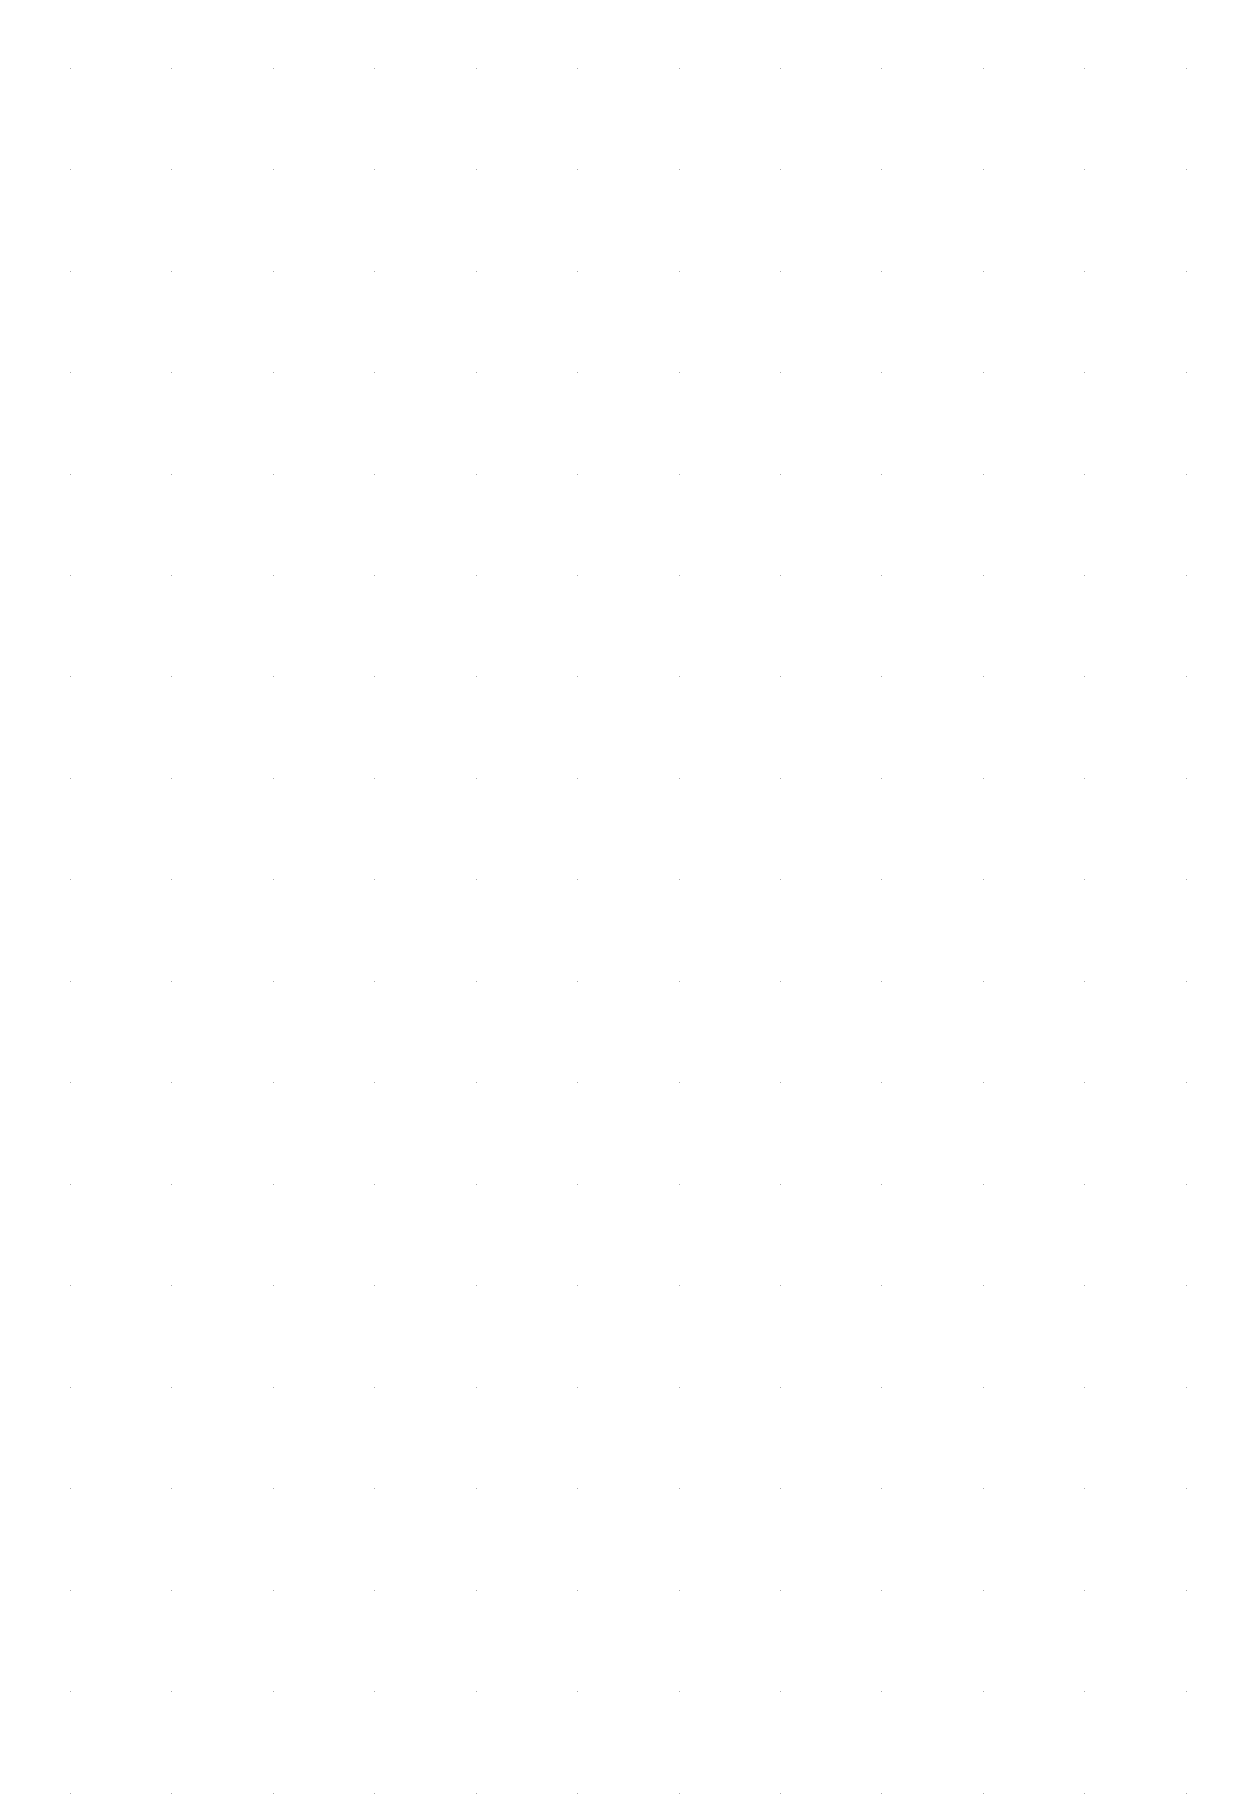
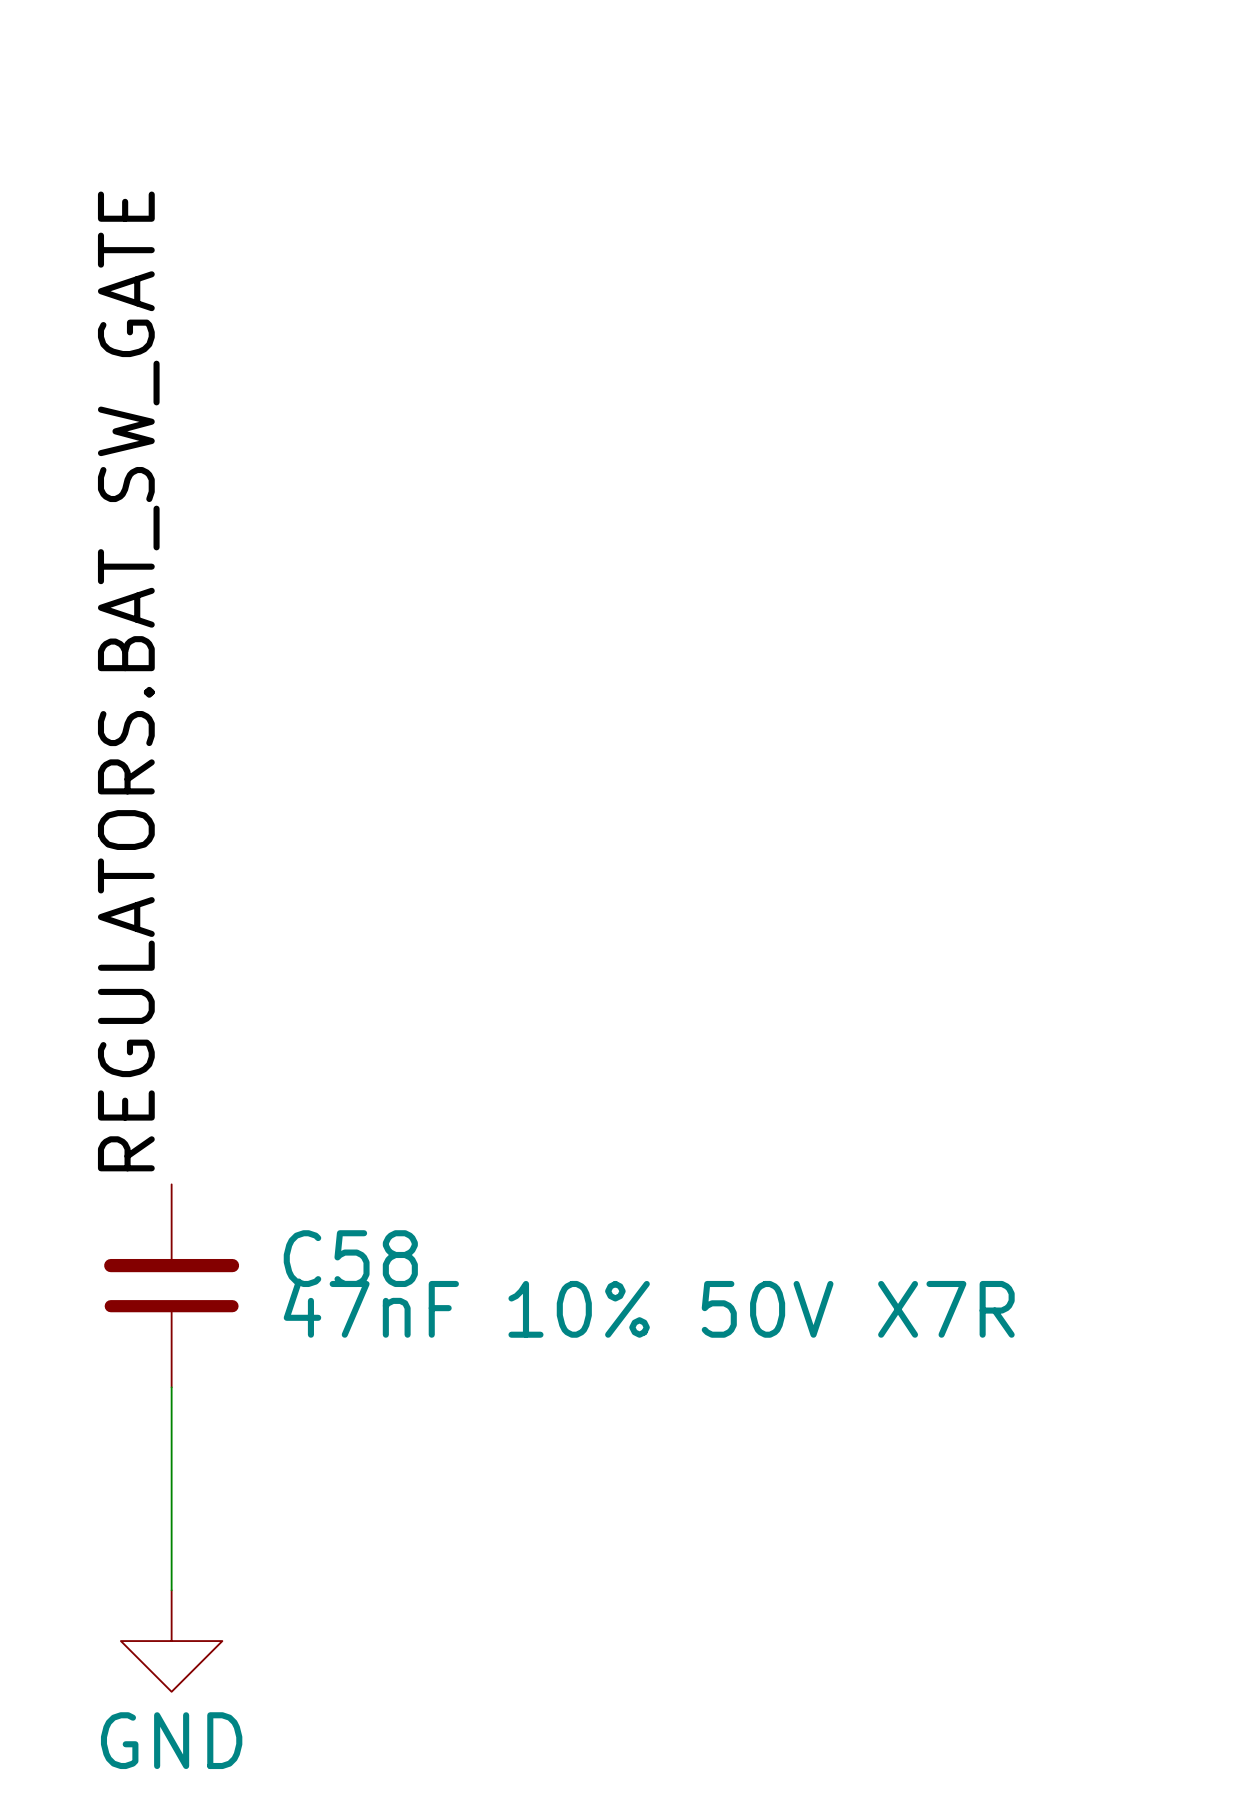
label: none -> REGULATORS.BAT_SW_GATE (128, 681)
C58: none -> 47nF 10% 50V X7R (171, 1285)
wire: none -> (171, 1387) (171, 1590)
power symbol: none -> GND (171, 1641)

